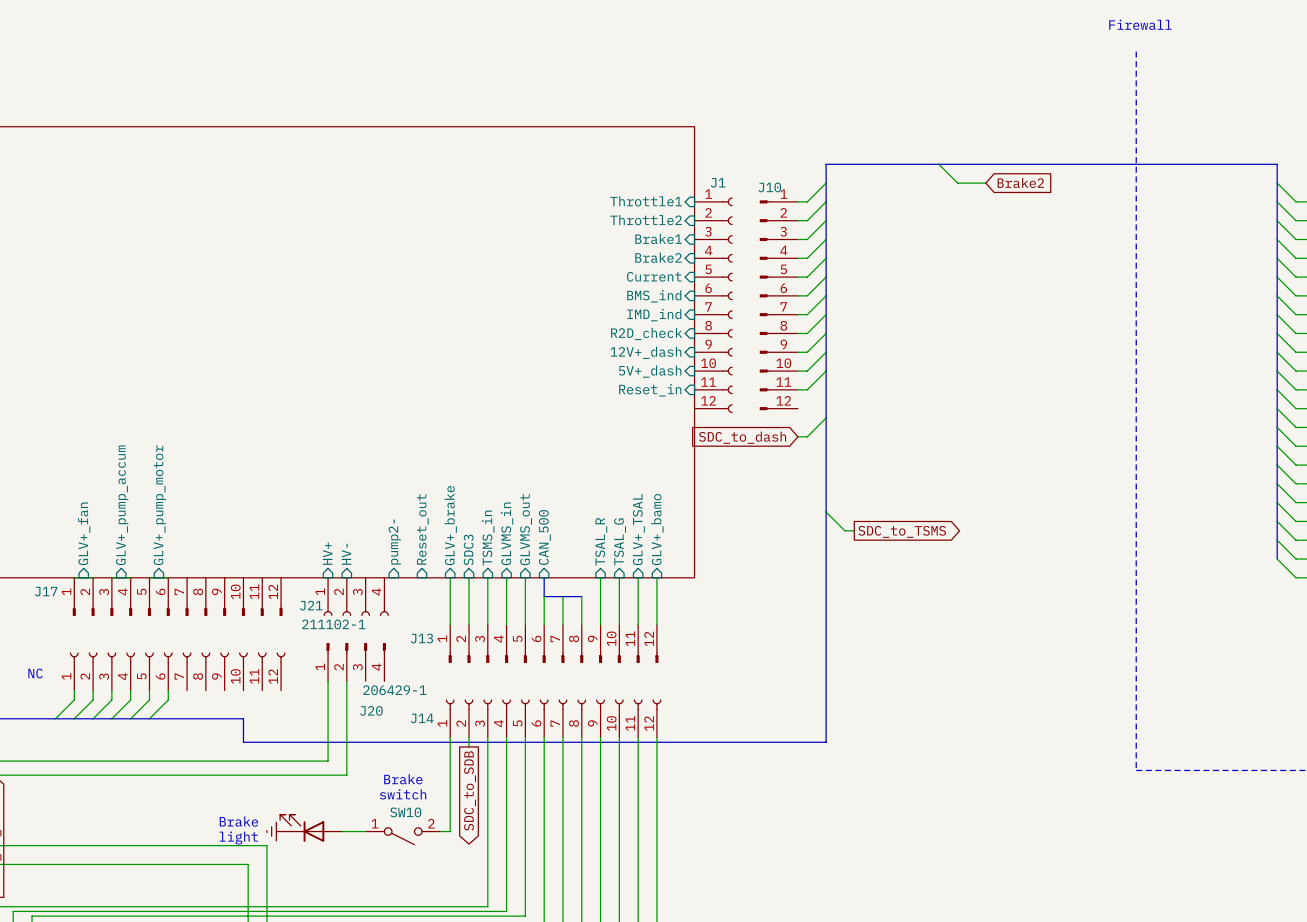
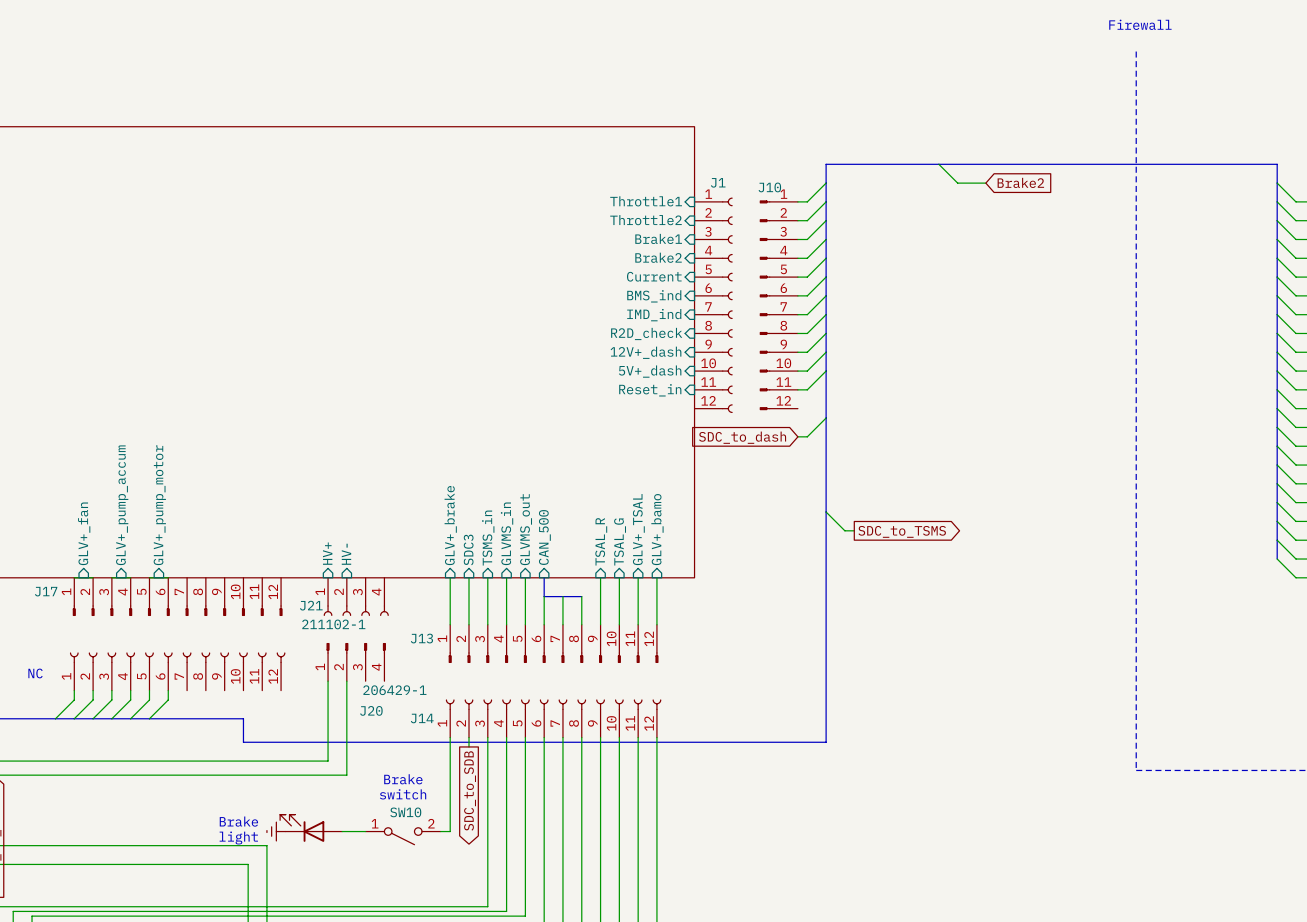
sheet pin: Reset_out (422, 529) -> none
sheet pin: pump2- (394, 542) -> none

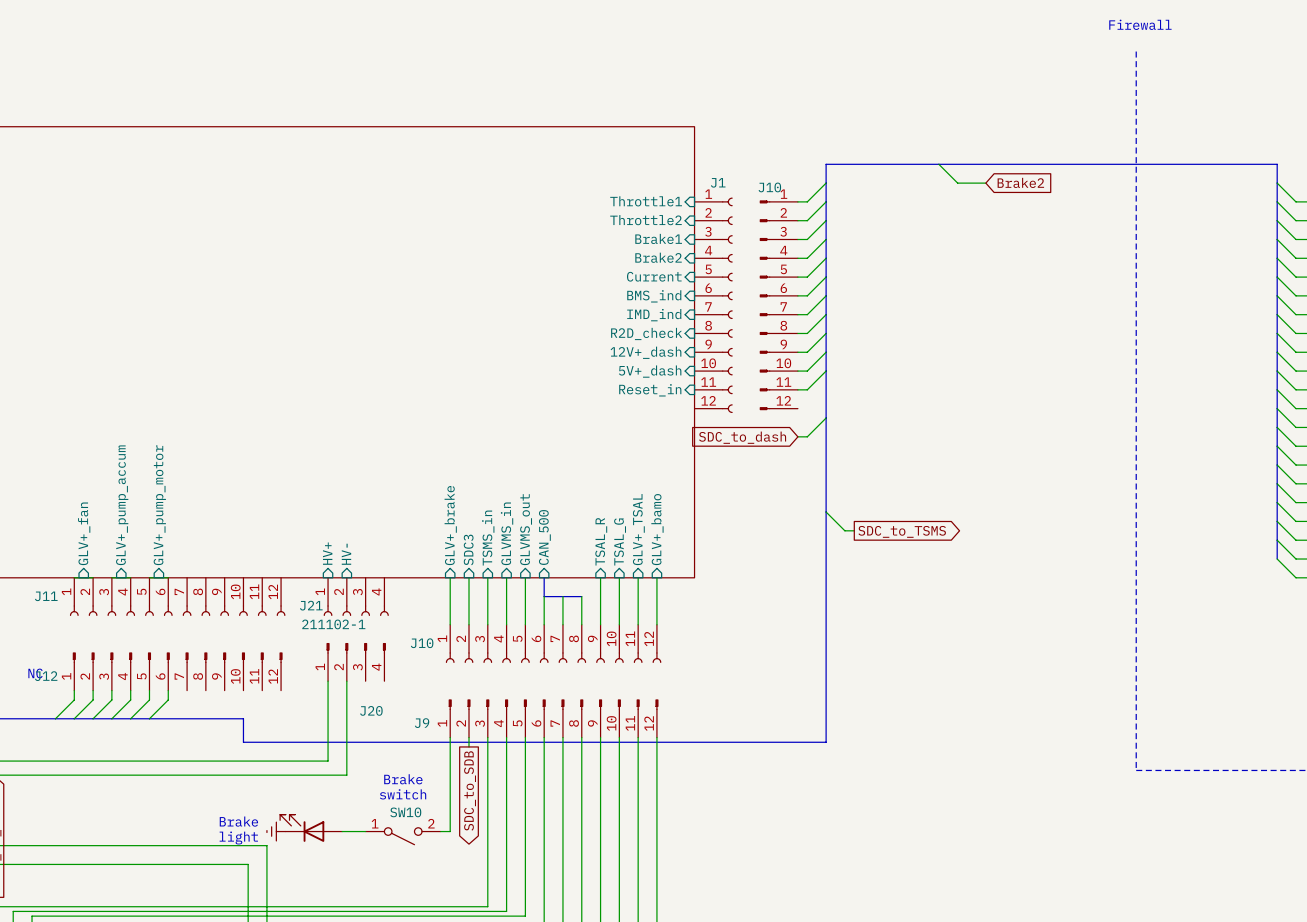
J17: (177, 596) -> none
J11: none -> (177, 596)
J13: (553, 643) -> none
J10: none -> (553, 643)
part: (177, 671) -> none
J12: none -> (177, 671)
J20 value: 206429-1 (394, 690) -> none
J14: (553, 718) -> none
J9: none -> (553, 718)

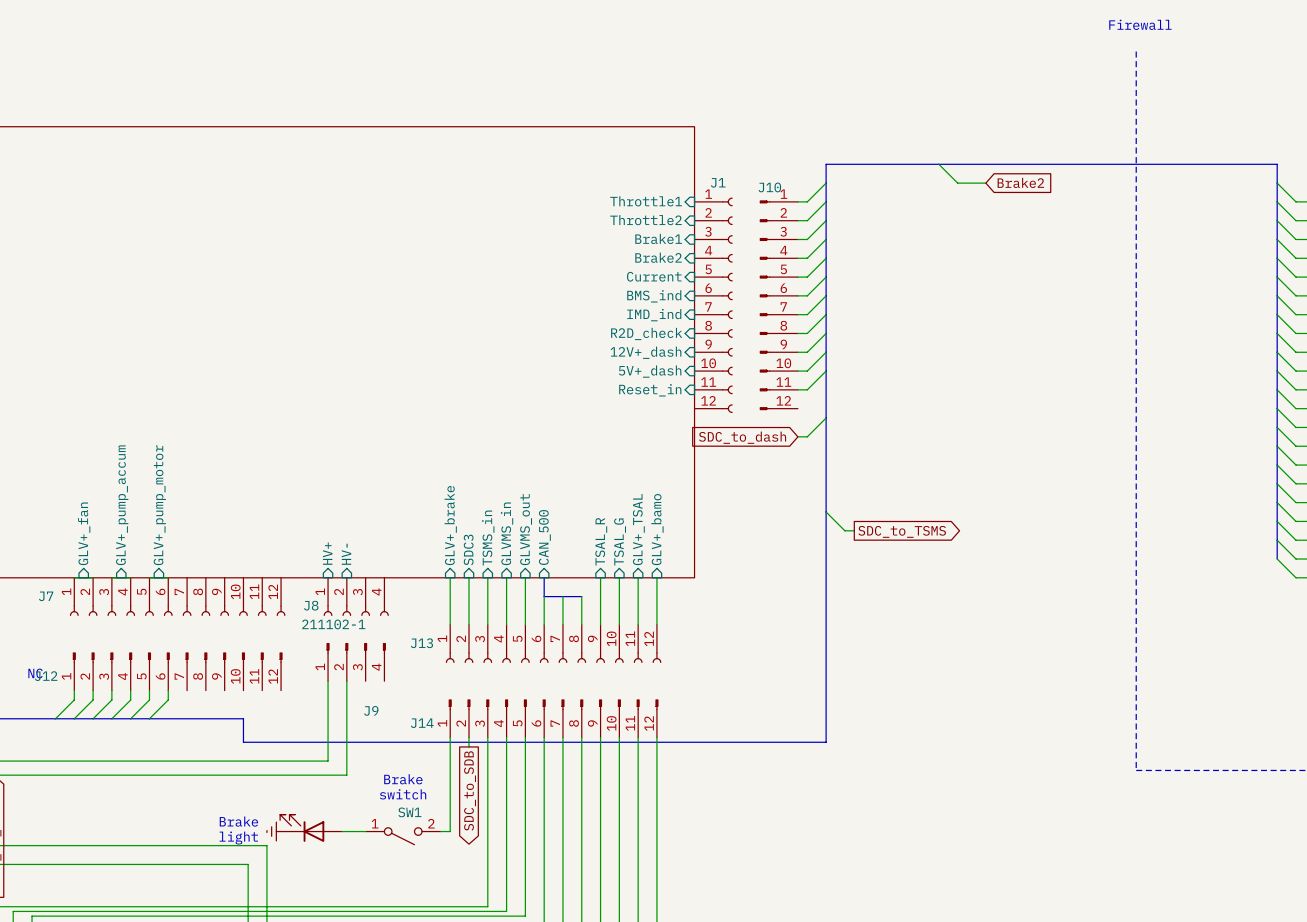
J11 name: J11 (46, 596) -> J7 (46, 596)
J21 name: J21 (311, 605) -> J8 (311, 605)
J10 name: J10 (422, 643) -> J13 (421, 643)
J20 name: J20 (371, 710) -> J9 (371, 710)
J9 name: J9 (422, 723) -> J14 (422, 723)
SW10 name: SW10 (405, 812) -> SW1 (409, 812)

